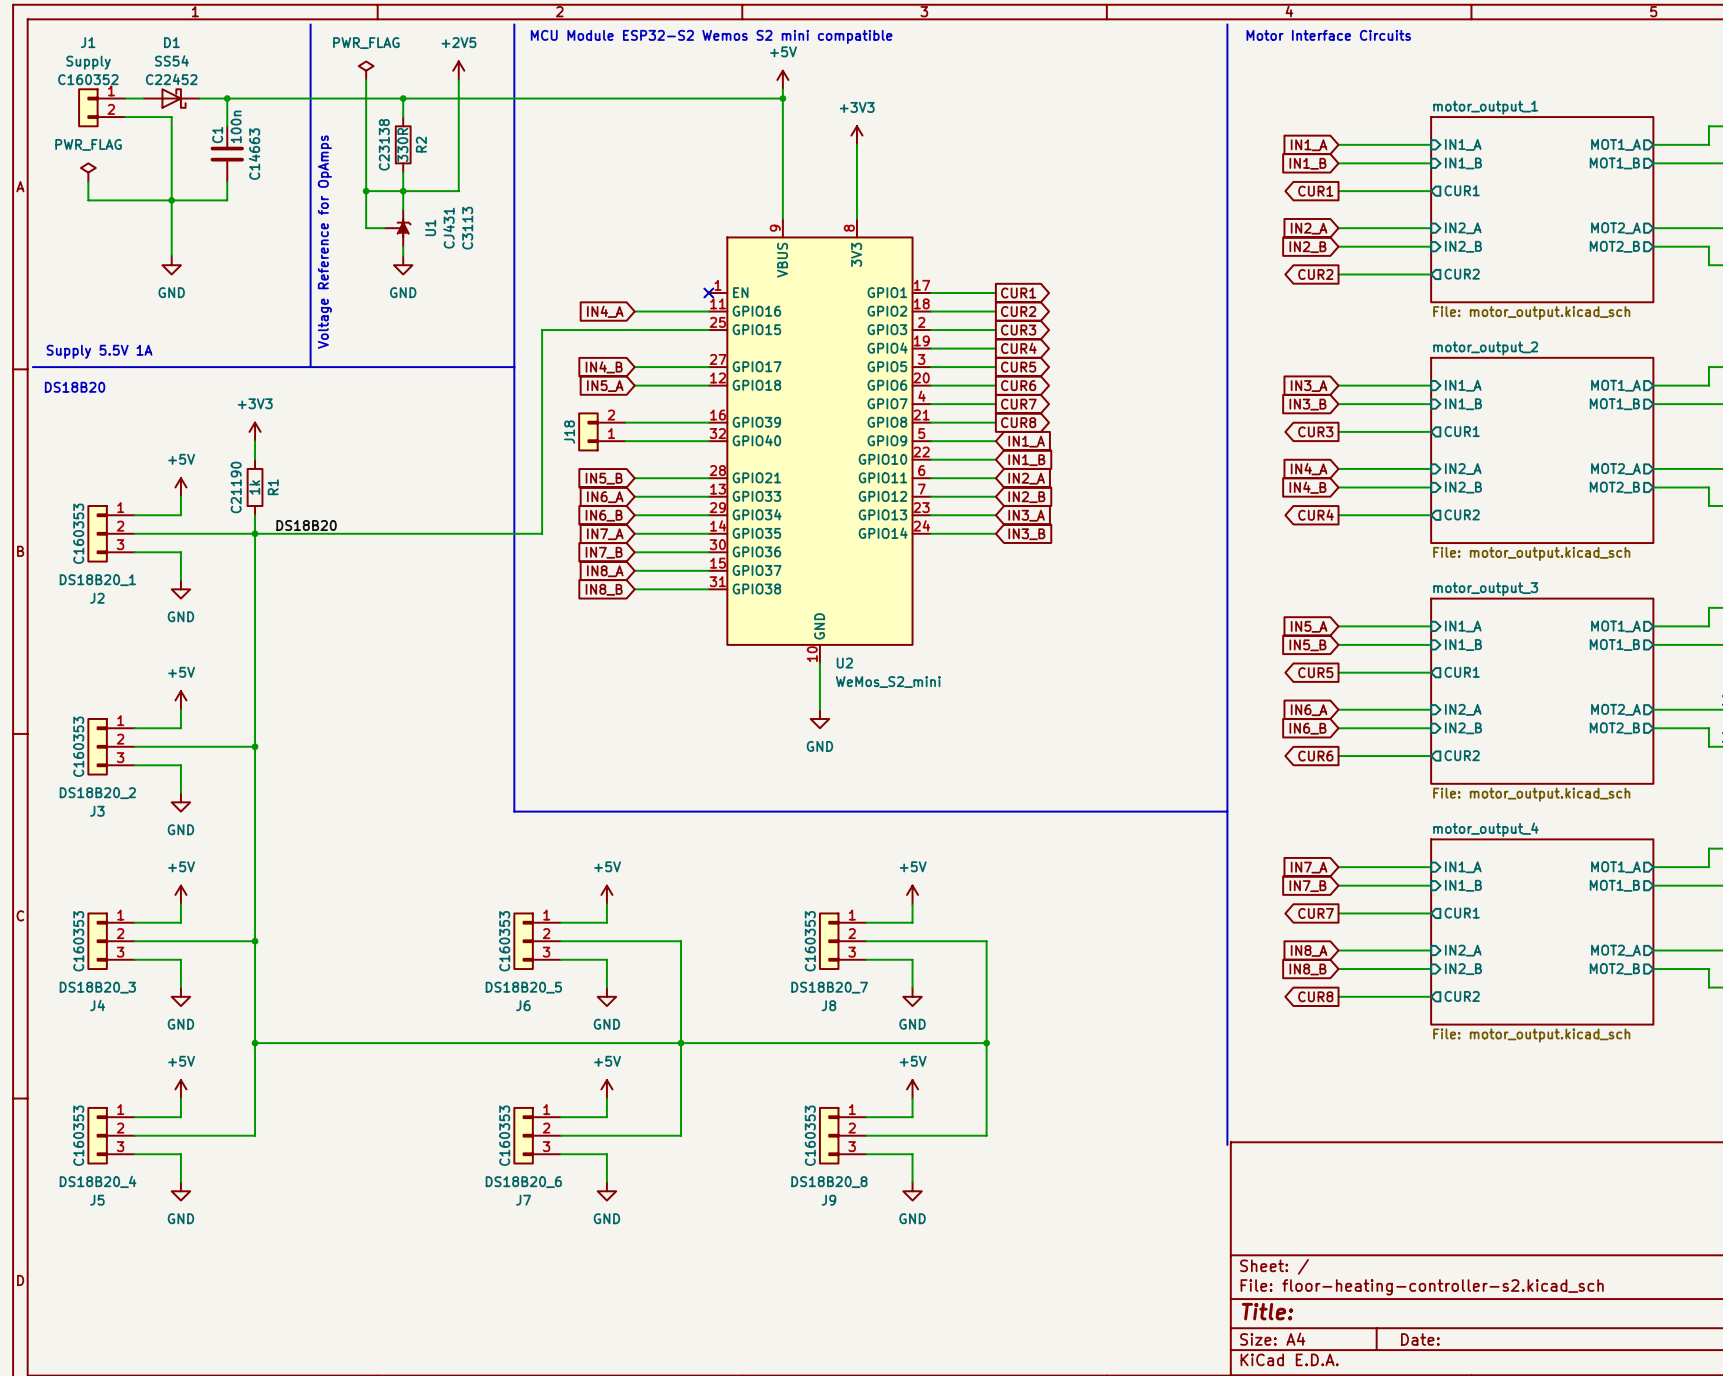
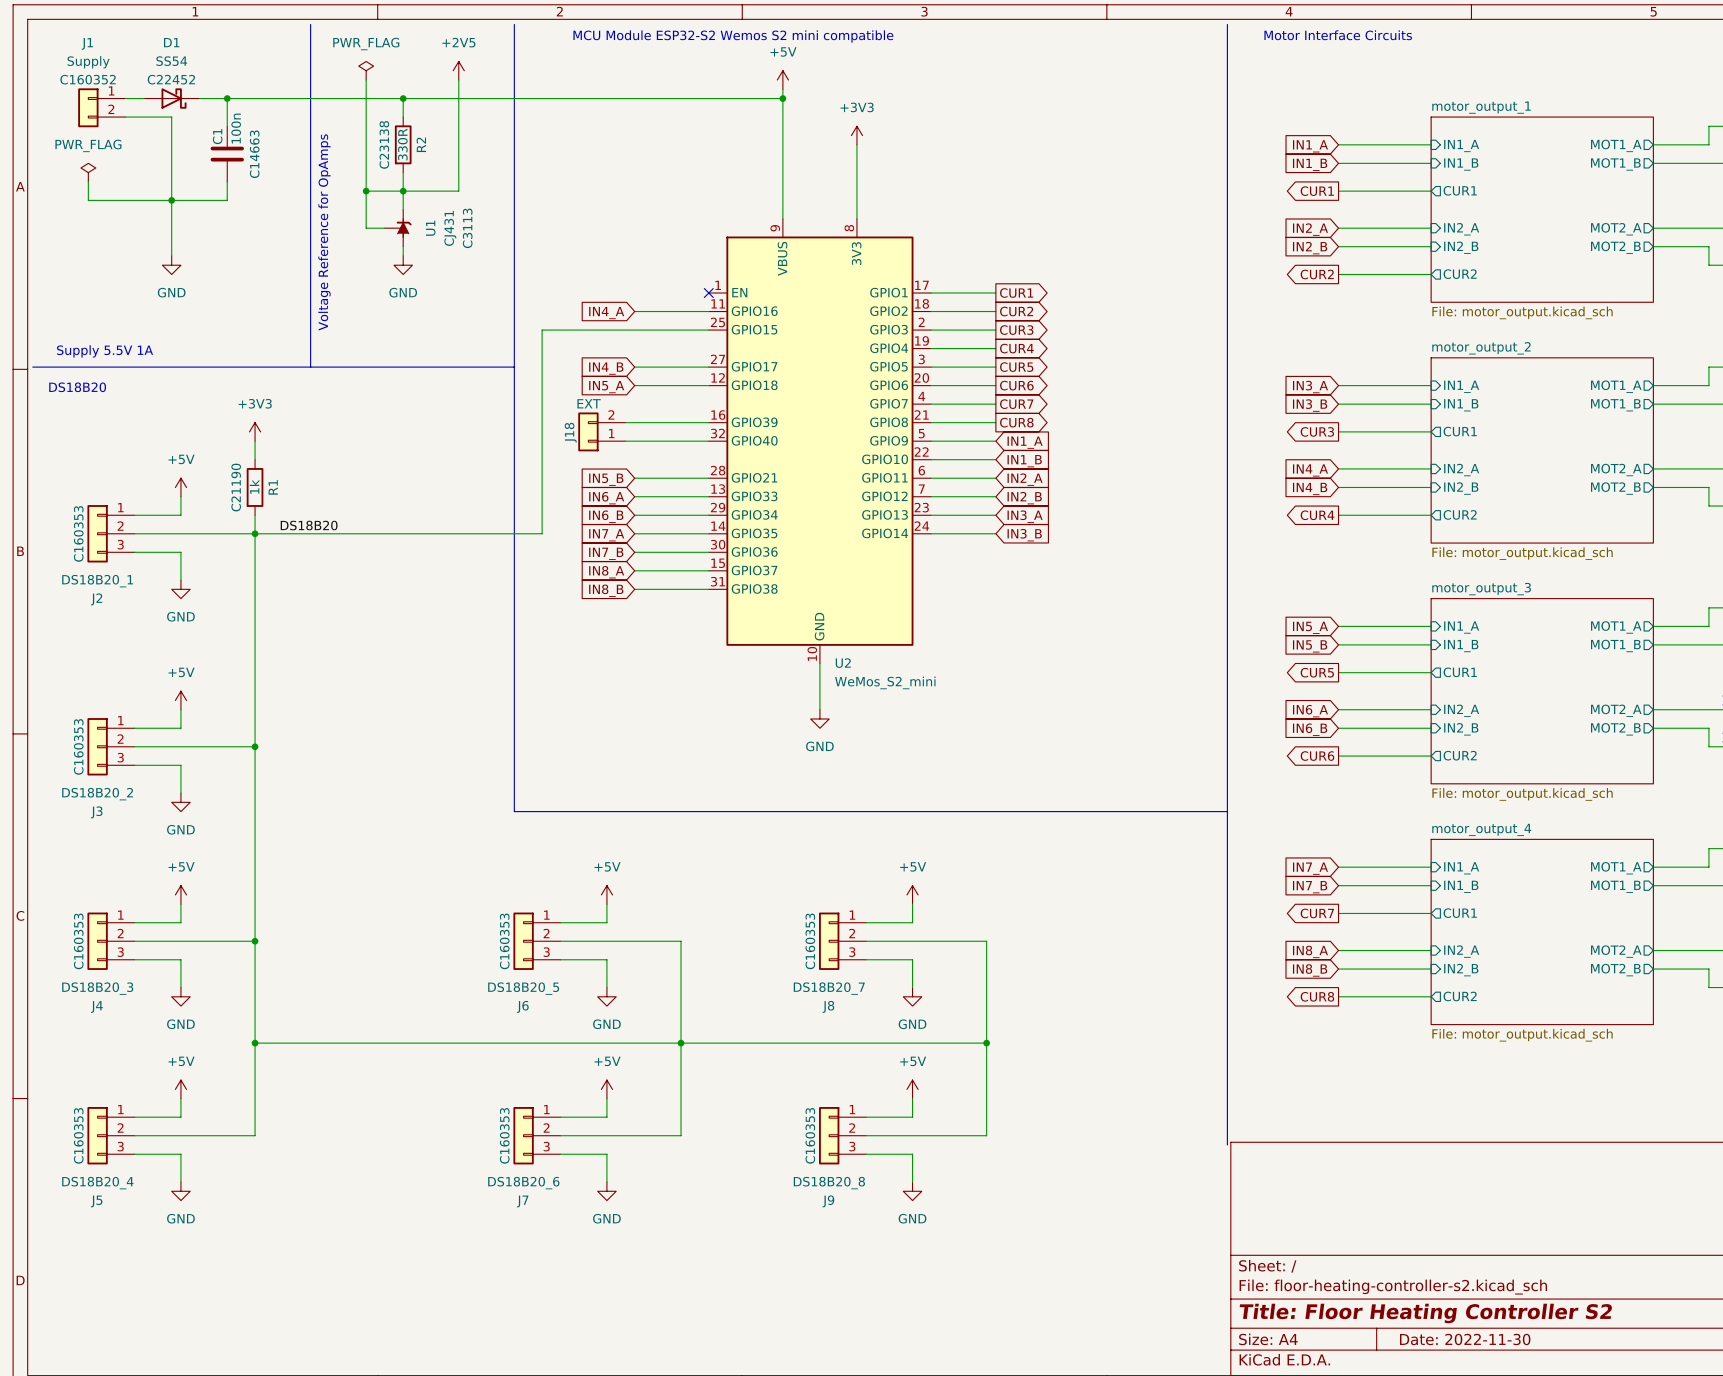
J18 value: none -> EXT (589, 403)
title block: Title: (1267, 1311) -> Title: Floor Heating Controller S2 (1425, 1313)
title block: Date: (1420, 1339) -> Date: 2022-11-30 (1465, 1339)

